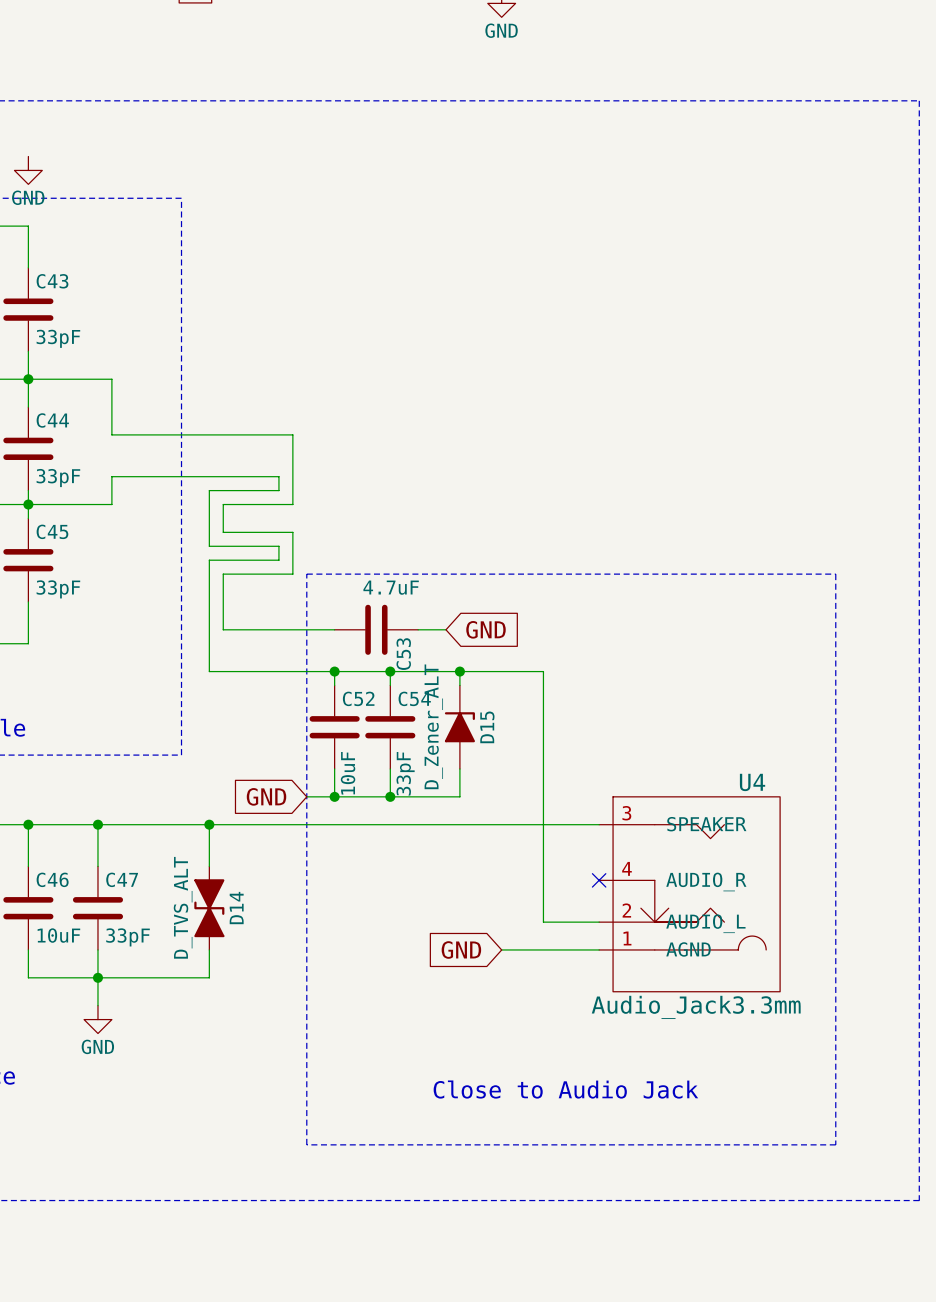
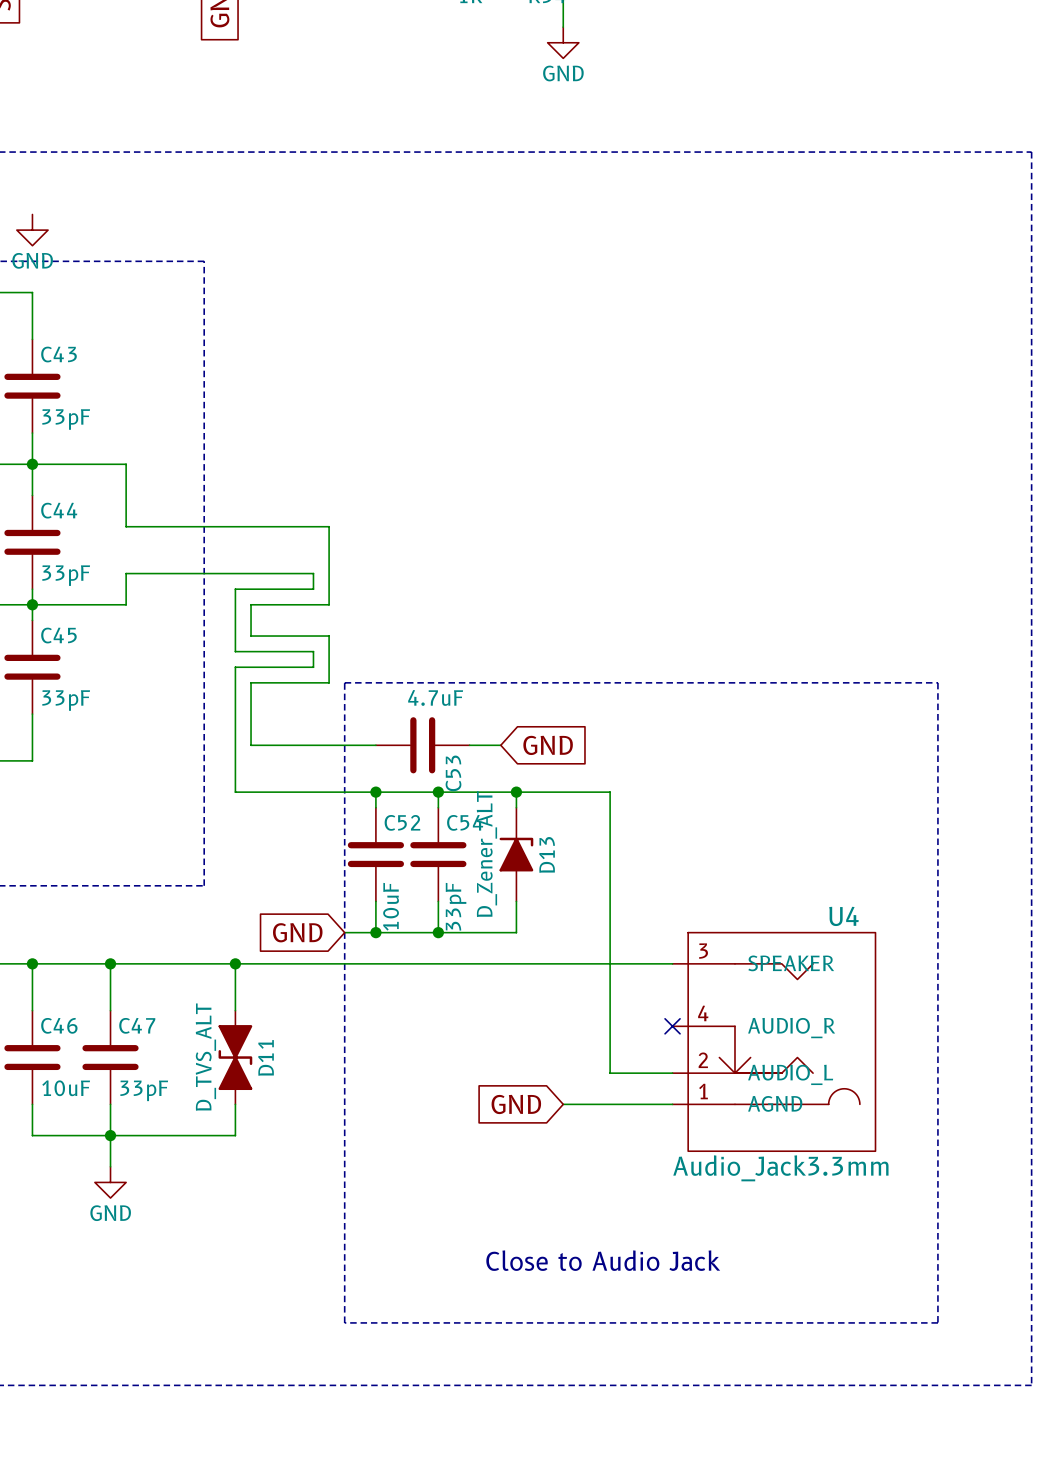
D15 name: D15 (487, 727) -> D13 (547, 854)
D14 name: D14 (236, 908) -> D11 (266, 1057)

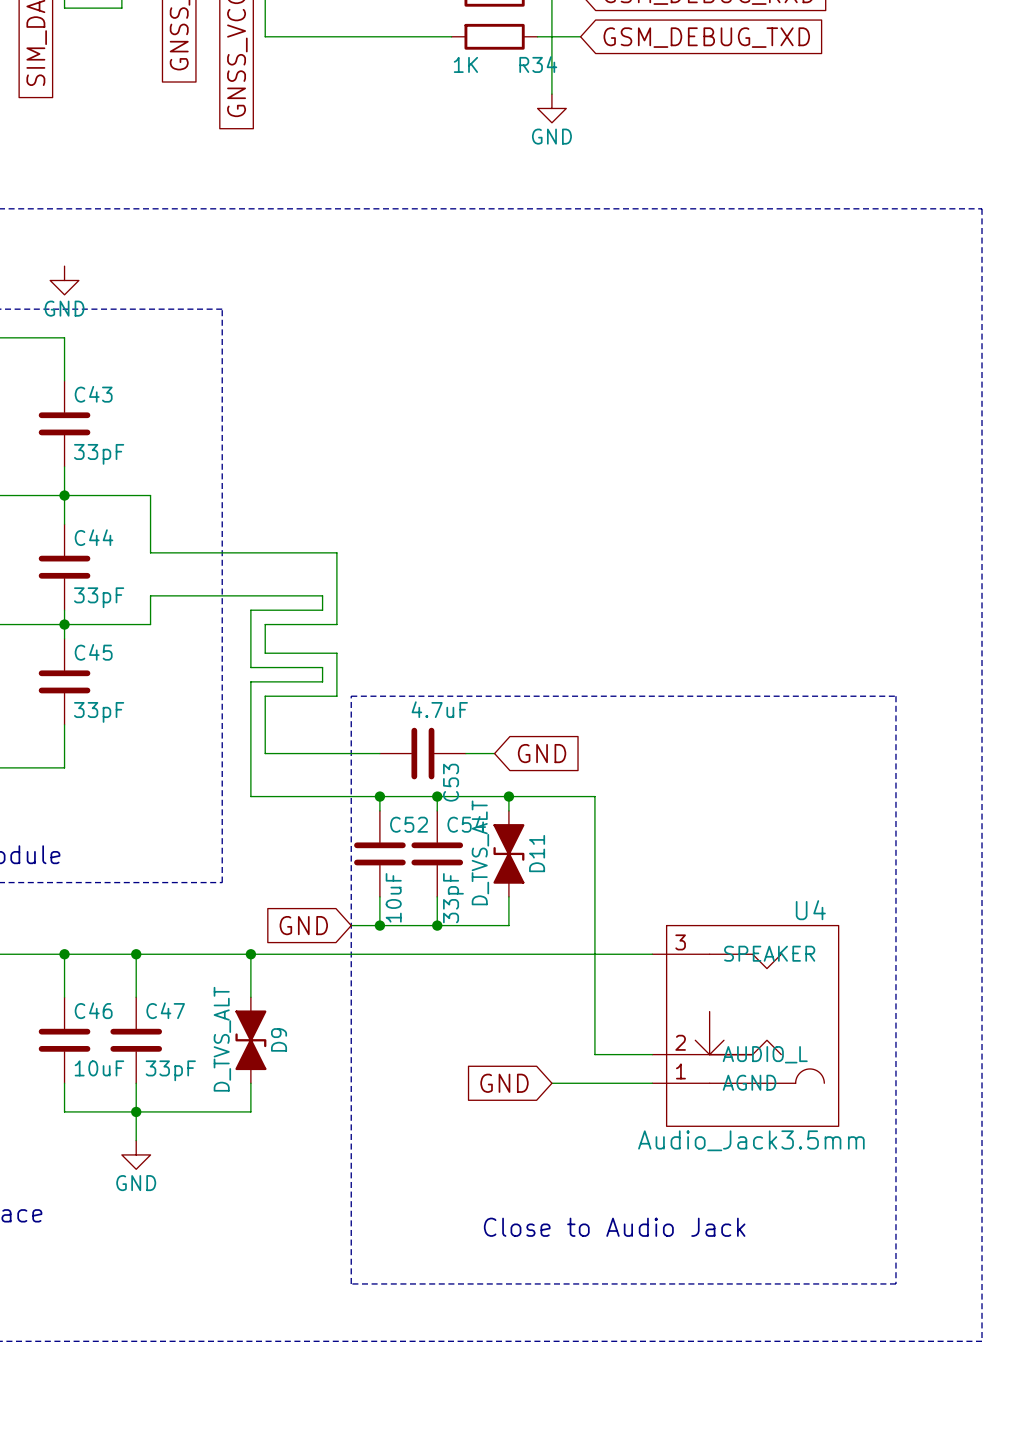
D13: D_Zener_ALT (516, 854) -> none
D11: none -> D_TVS_ALT (508, 853)
U4 symbol: [672, 932, 876, 1152] -> [652, 925, 839, 1127]
no-connect mark: (672, 1026) -> none
D11 name: D11 (266, 1057) -> D9 (279, 1039)
U4 value: Audio_Jack3.3mm (780, 1168) -> Audio_Jack3.5mm (751, 1140)

